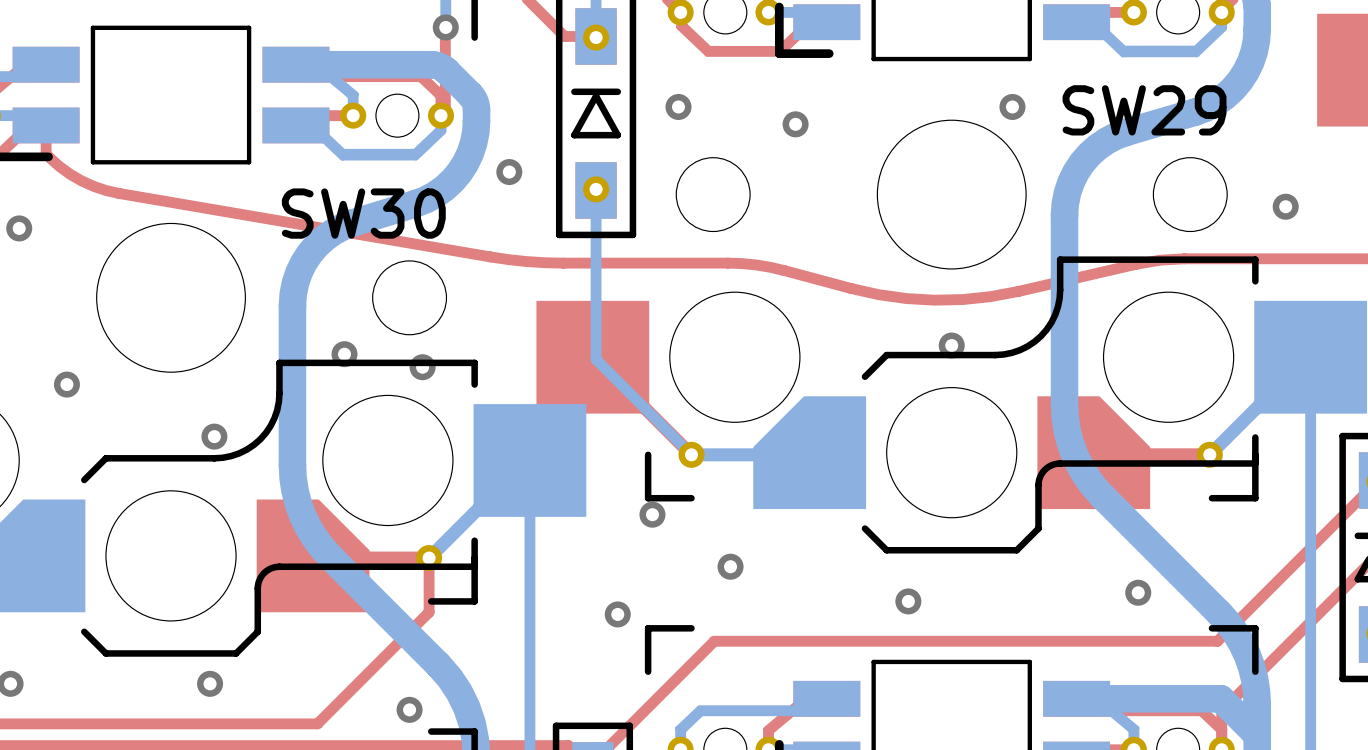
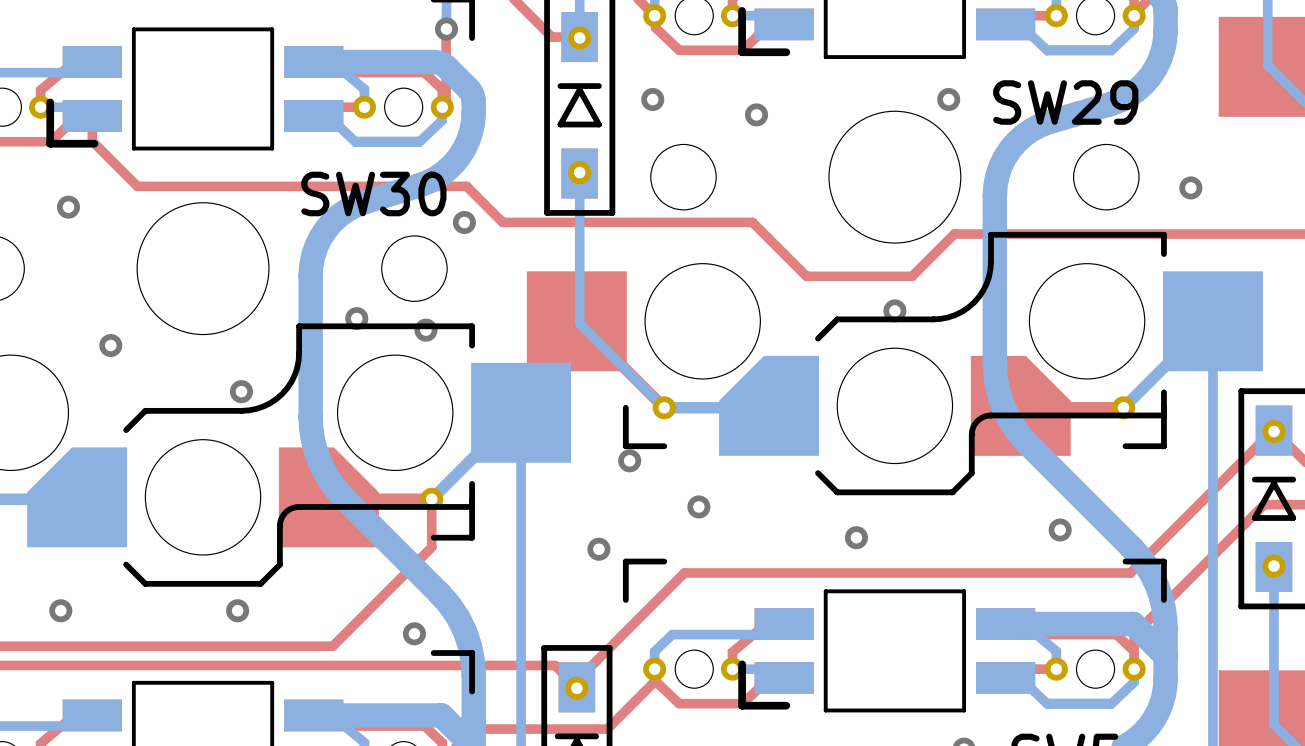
top track: (49, 157) (69, 174) (106, 190) (490, 256) (545, 262) (727, 263) (756, 264) (878, 294) (906, 298) (962, 299) (990, 296) (1135, 264) (1184, 258) -> (95, 144) (137, 186) (466, 186) (502, 222) (752, 222) (806, 276) (912, 276) (954, 234) (1101, 234)
via position: (509, 172) -> (464, 222)

